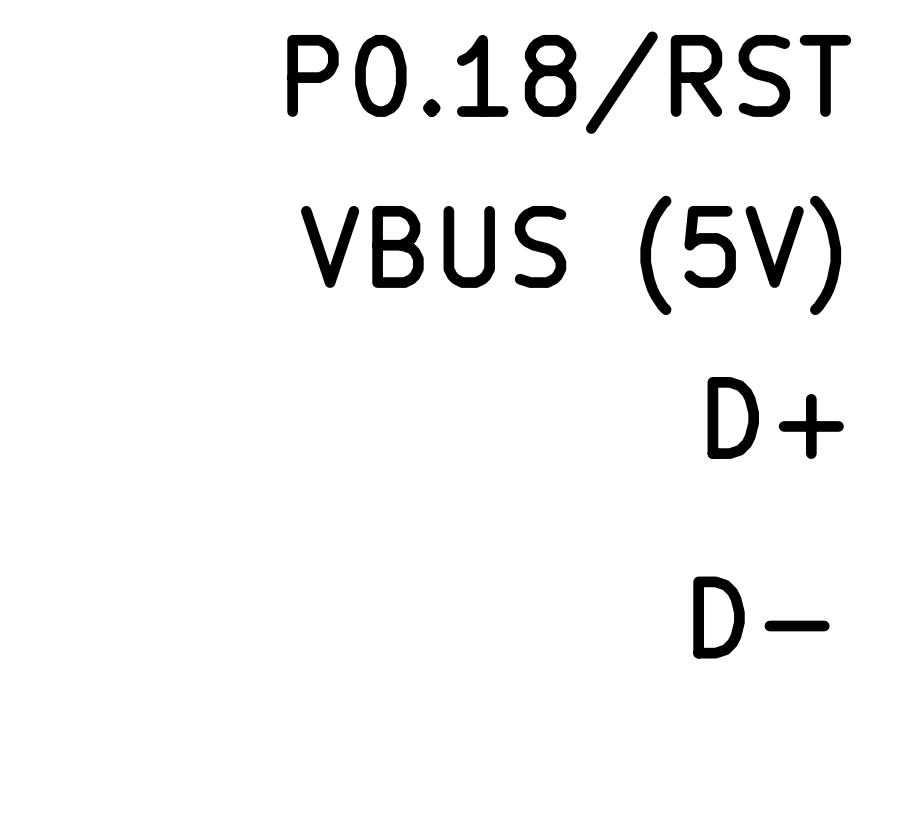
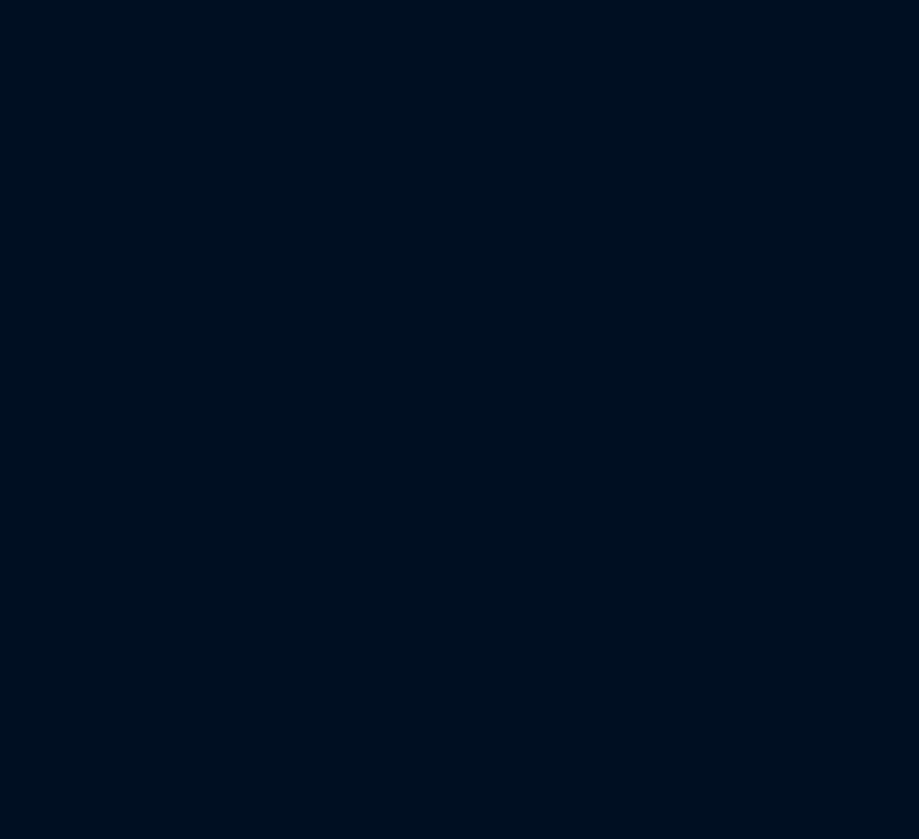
text: P0.18/RST (569, 82) -> none
text: VBUS (5V) (571, 255) -> none
text: D+ (775, 417) -> none
text: D- (761, 617) -> none

